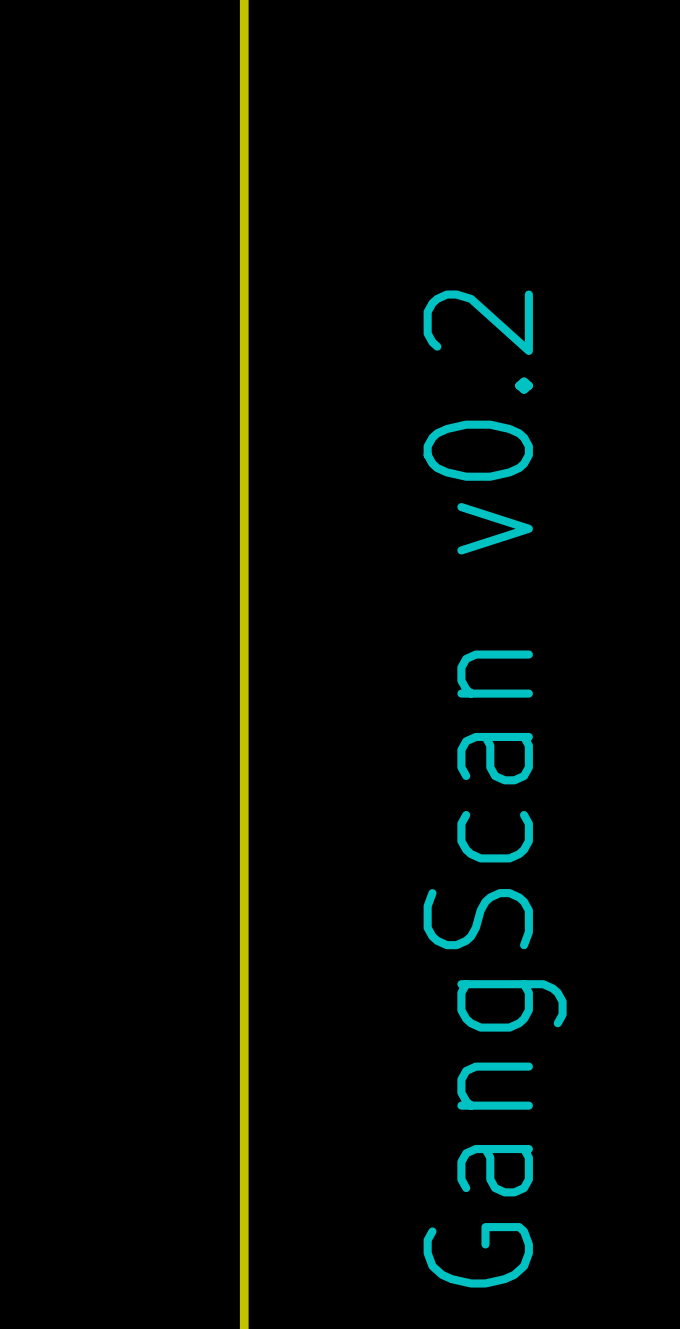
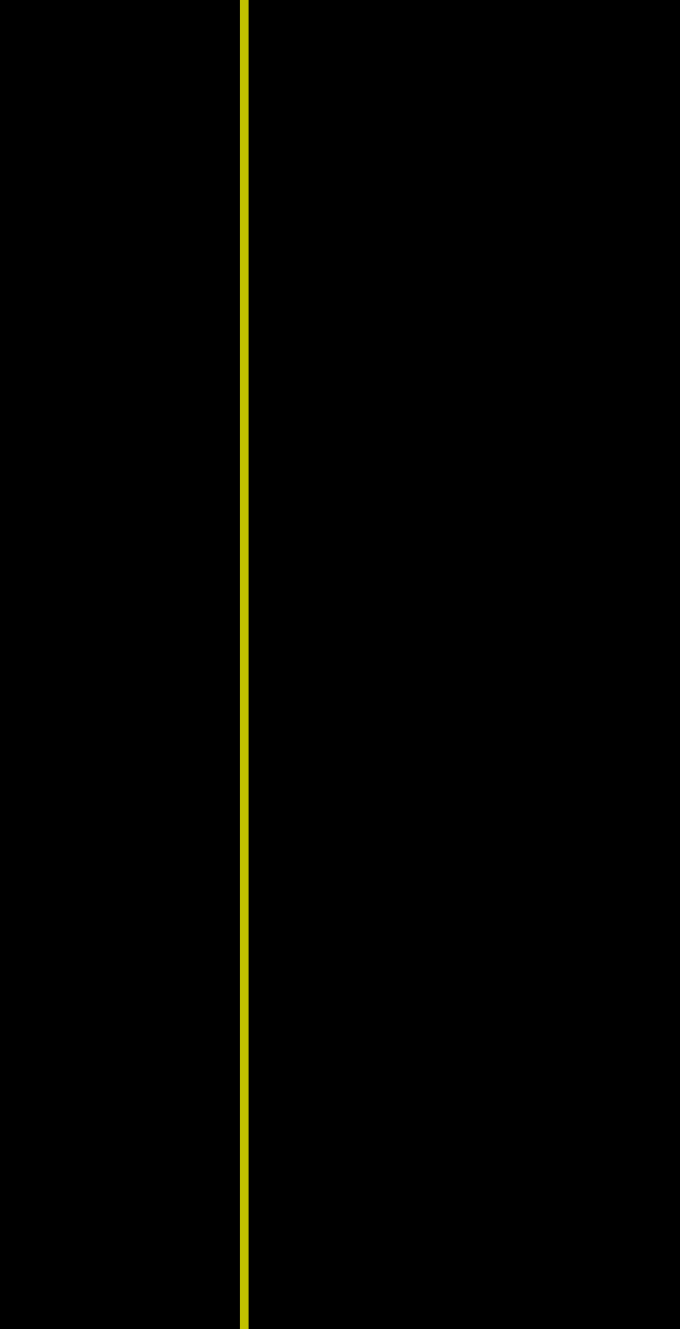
text: GangScan v0.2 (495, 789) -> none

